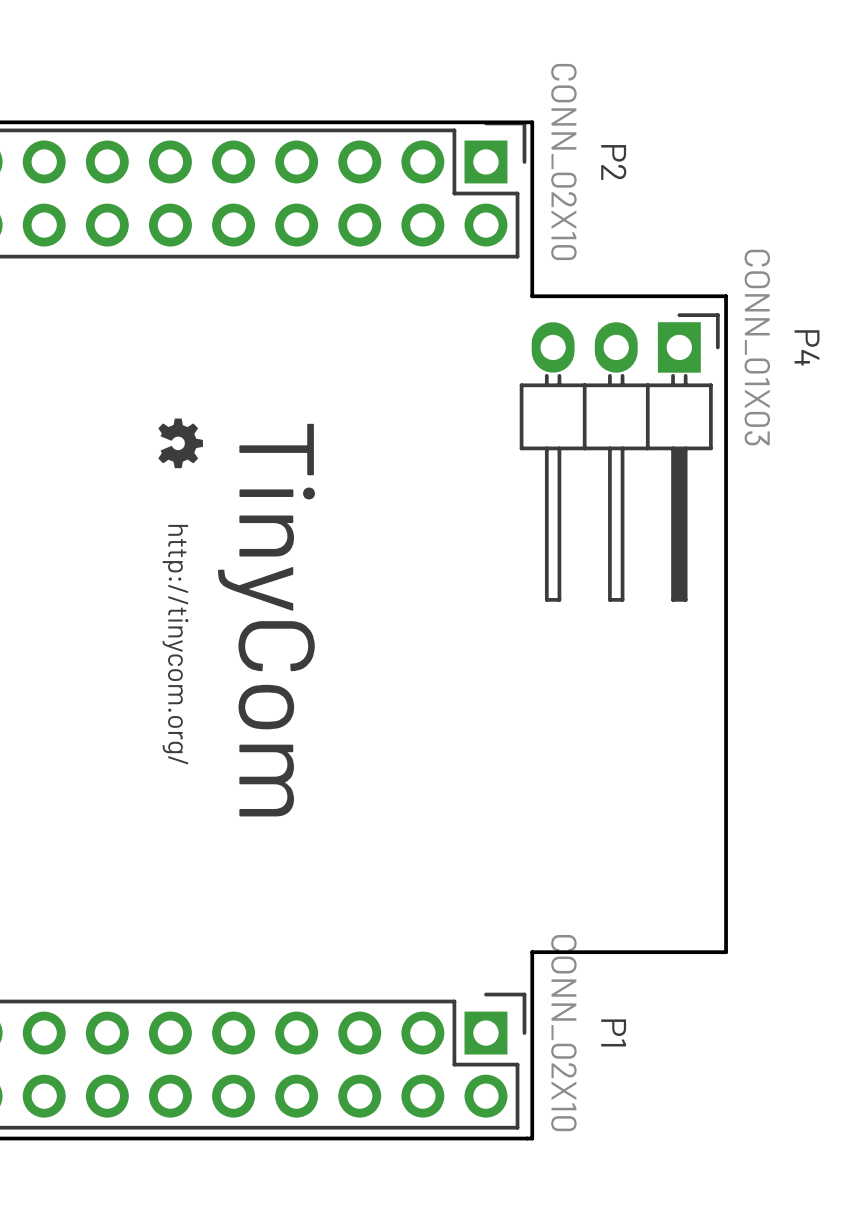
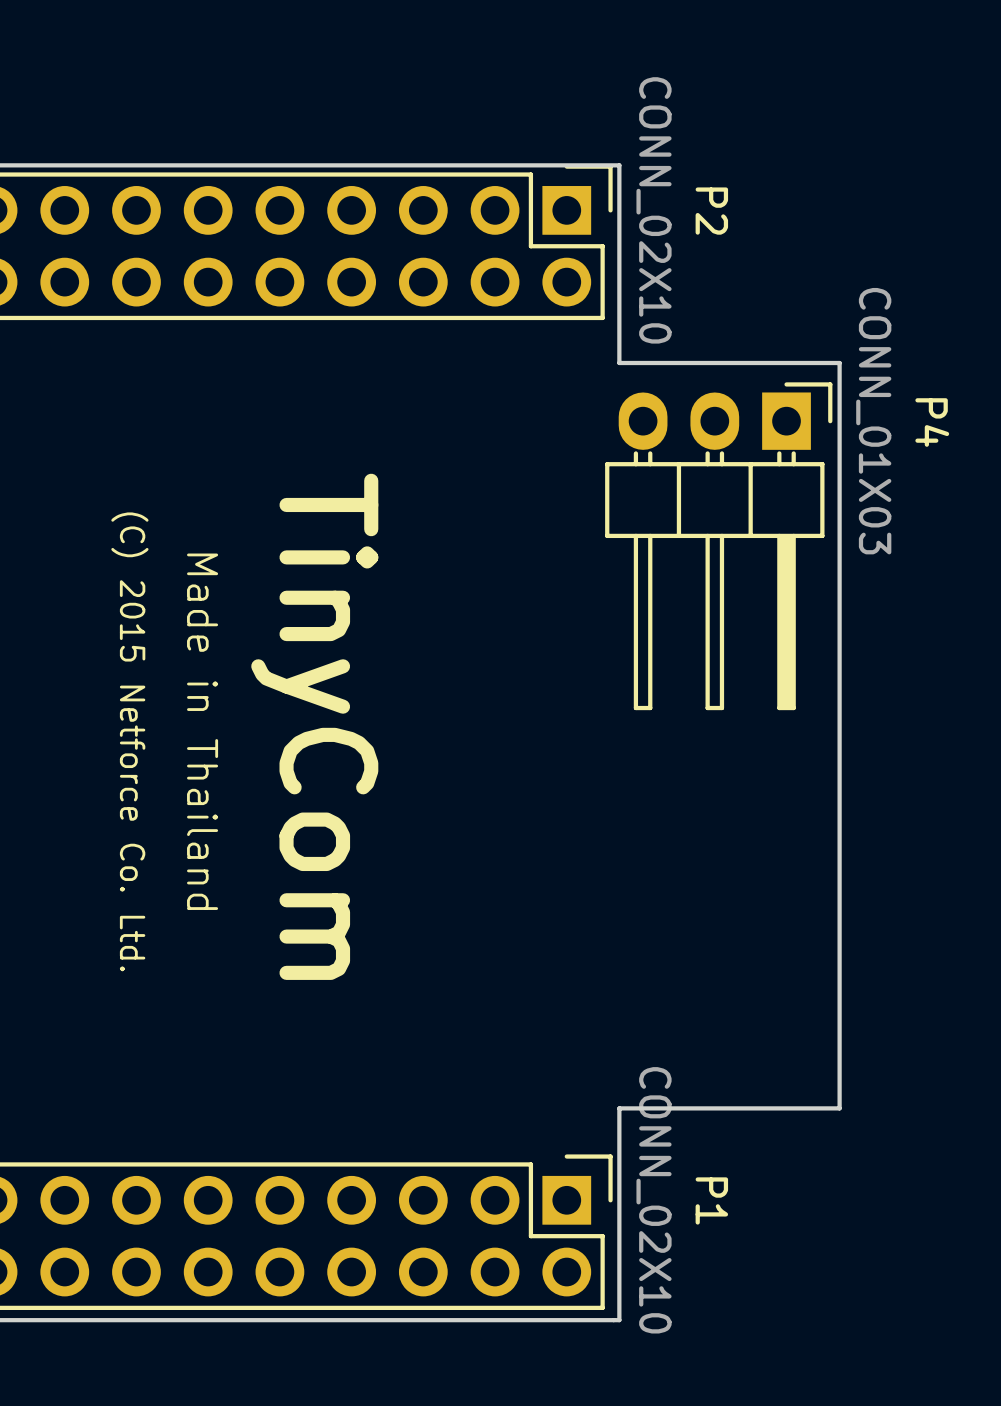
drawing: [158, 418, 204, 469] -> none
text: none -> Made in Thailand (202, 731)
text: none -> (C) 2015 Netforce Co. Ltd. (129, 741)
text: http://tinycom.org/ (175, 644) -> none

